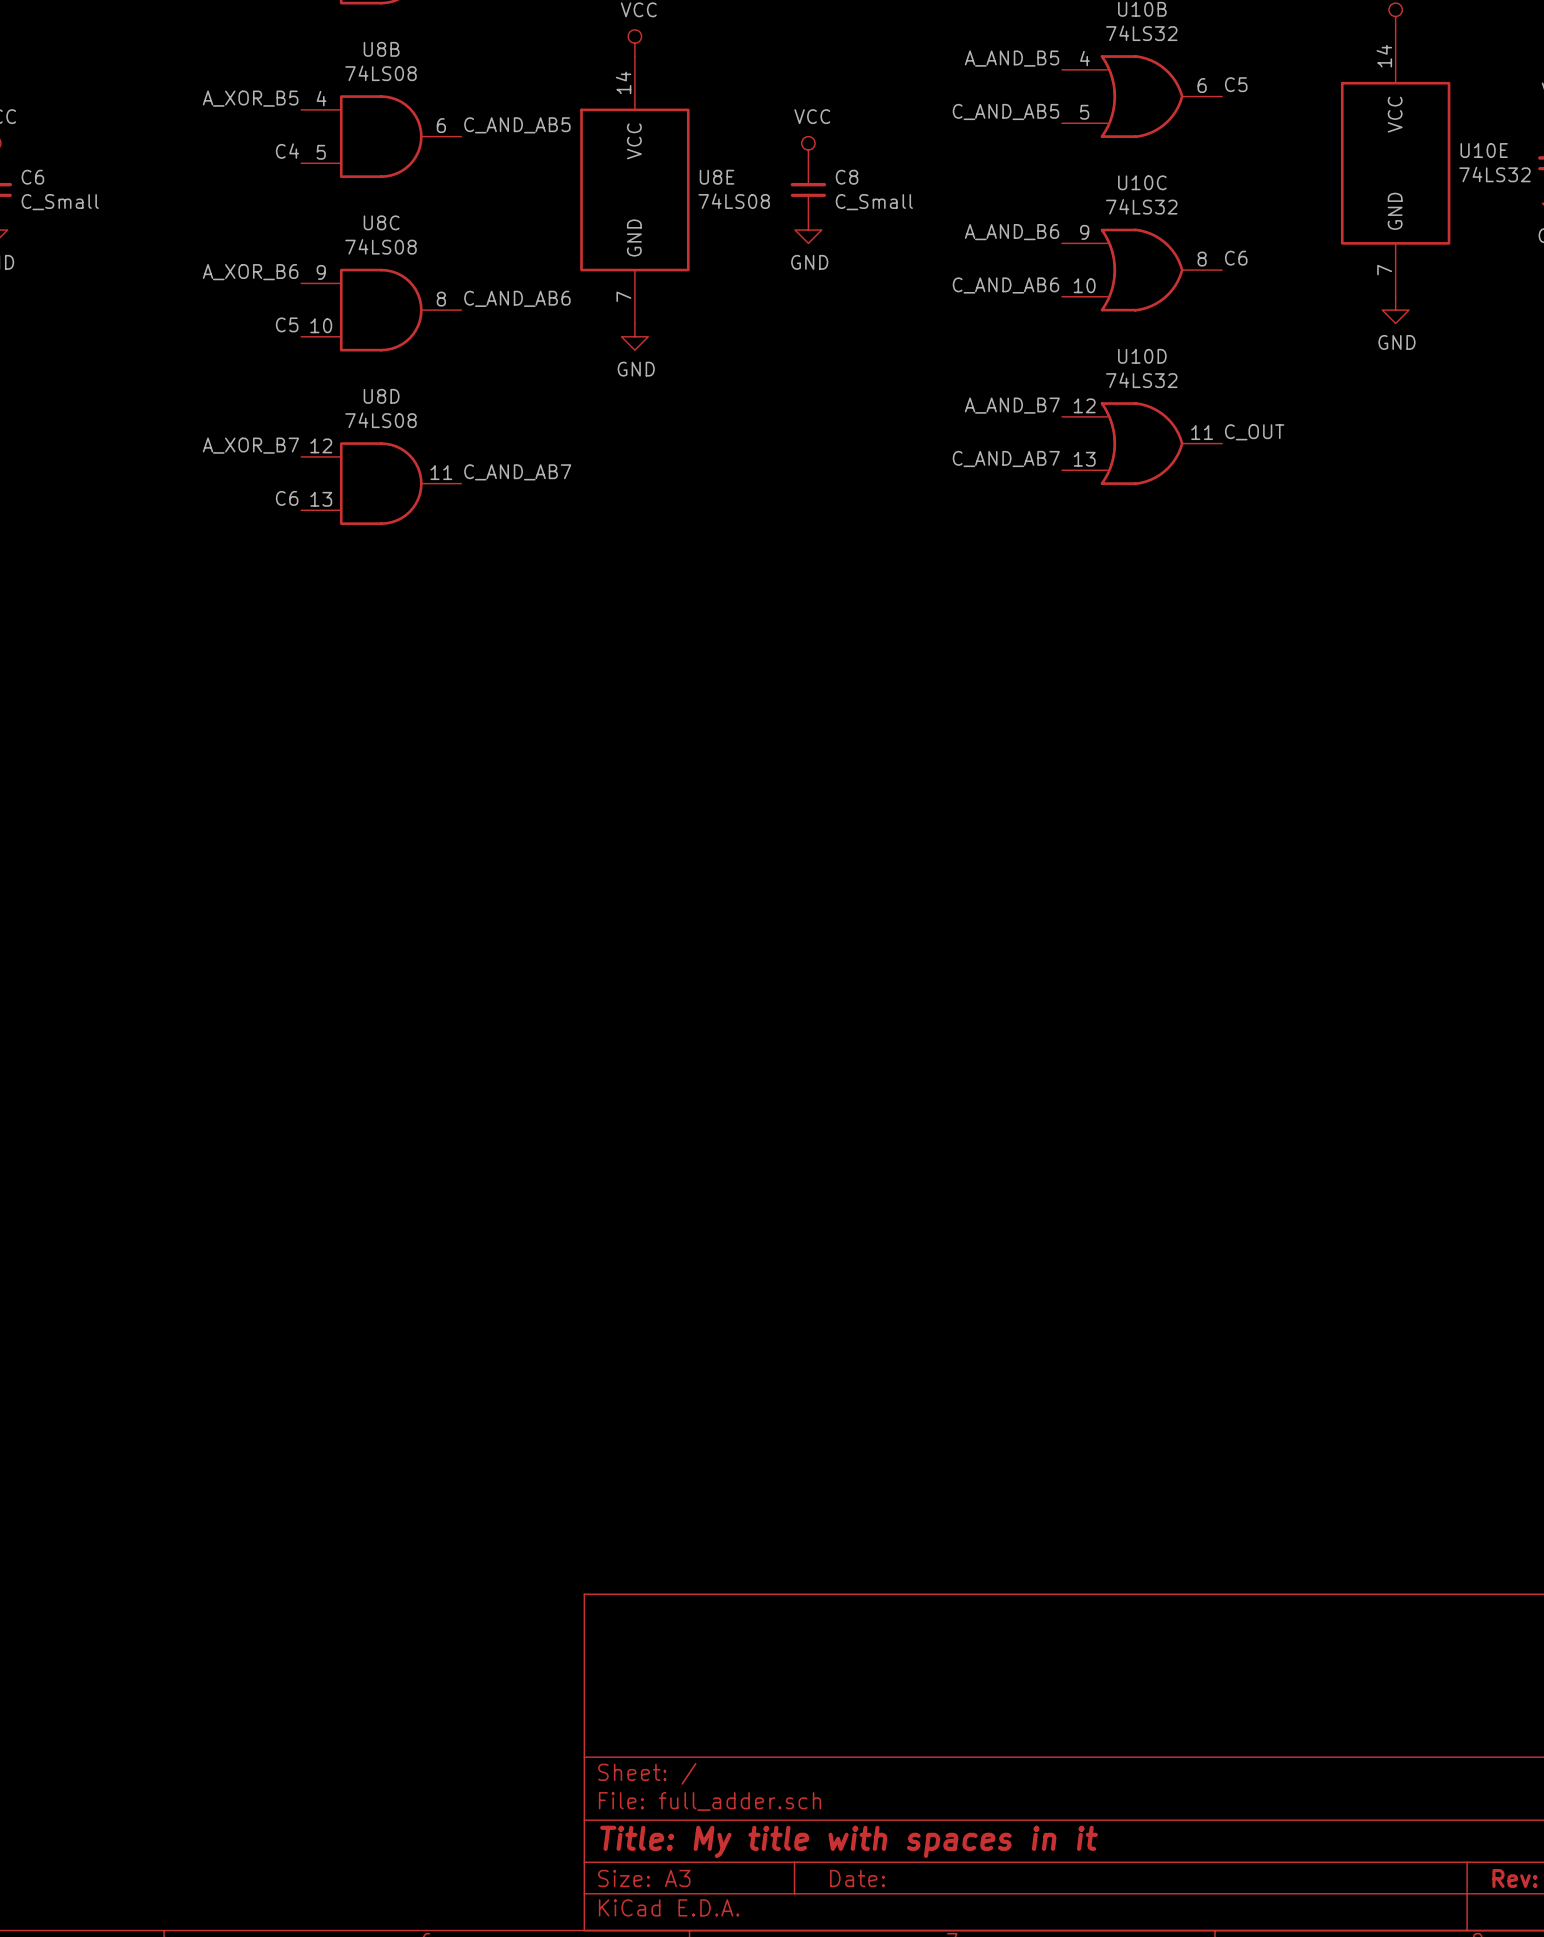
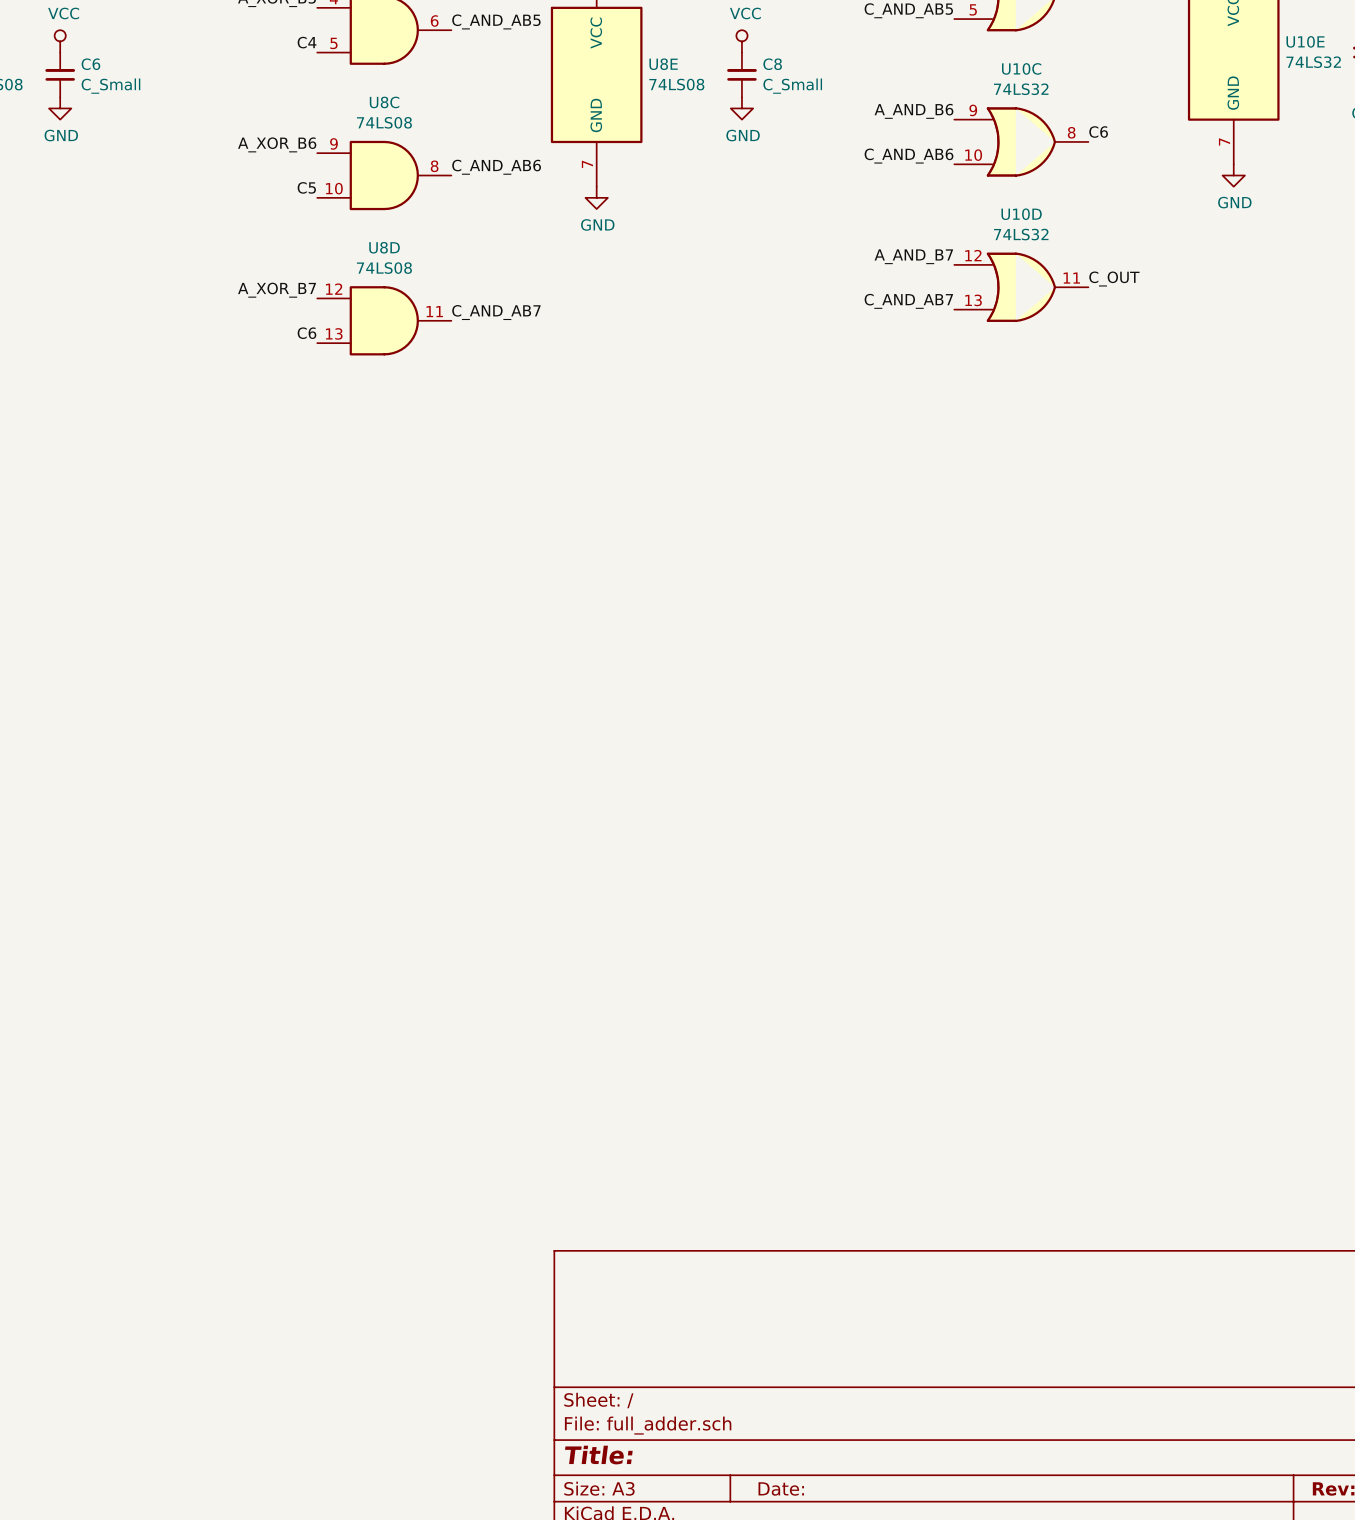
title block: Title: My title with spaces in it (849, 1841) -> Title: (598, 1455)

